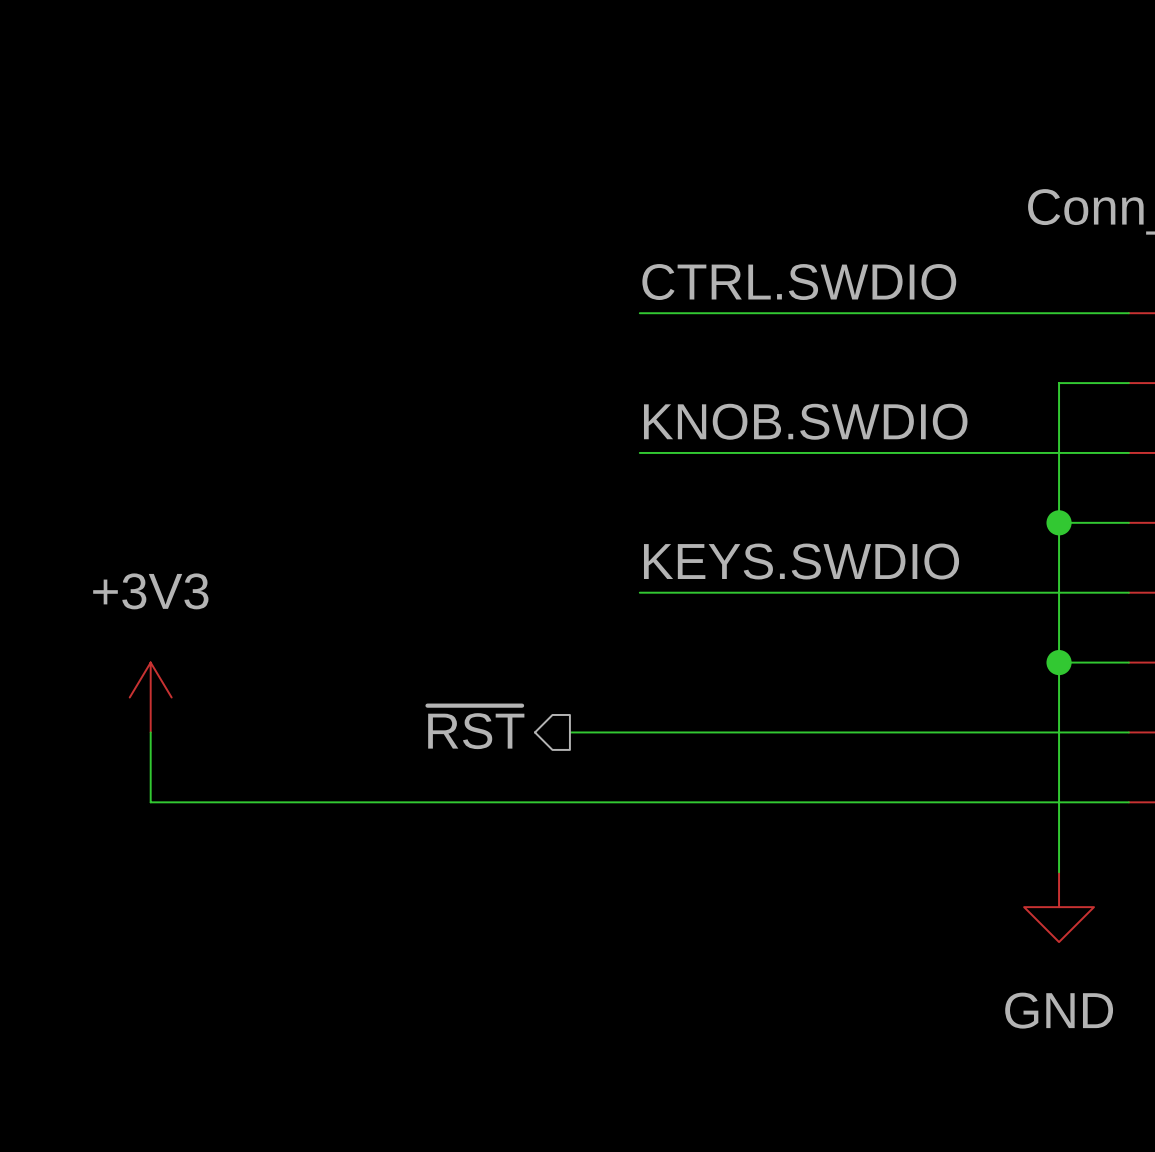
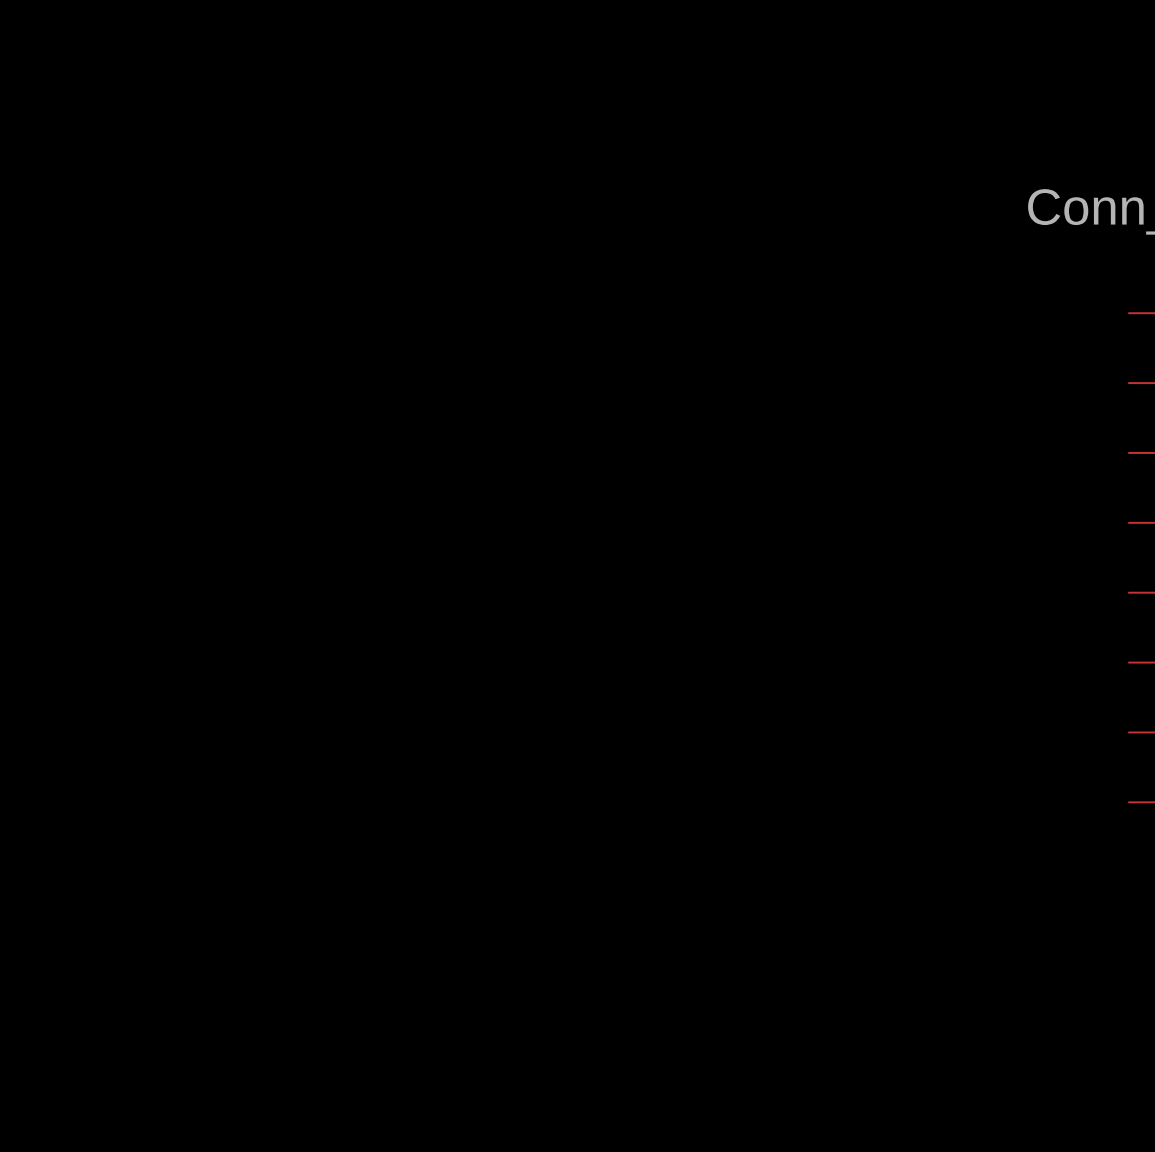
label: CTRL.SWDIO (799, 282) -> none
wire: (639, 313) (1128, 313) -> none
wire: (1128, 383) (1059, 383) (1059, 872) -> none
label: KNOB.SWDIO (805, 421) -> none
wire: (639, 452) (1128, 452) -> none
wire: (1059, 522) (1128, 522) -> none
junction: (1059, 522) -> none
label: KEYS.SWDIO (801, 561) -> none
wire: (639, 592) (1128, 592) -> none
wire: (1059, 662) (1128, 662) -> none
junction: (1059, 662) -> none
power symbol: +3V3 (150, 697) -> none
hierarchical label: ~{RST} (475, 727) -> none
wire: (150, 732) (150, 802) (1128, 802) -> none
wire: (569, 732) (1128, 732) -> none
power symbol: GND (1059, 907) -> none

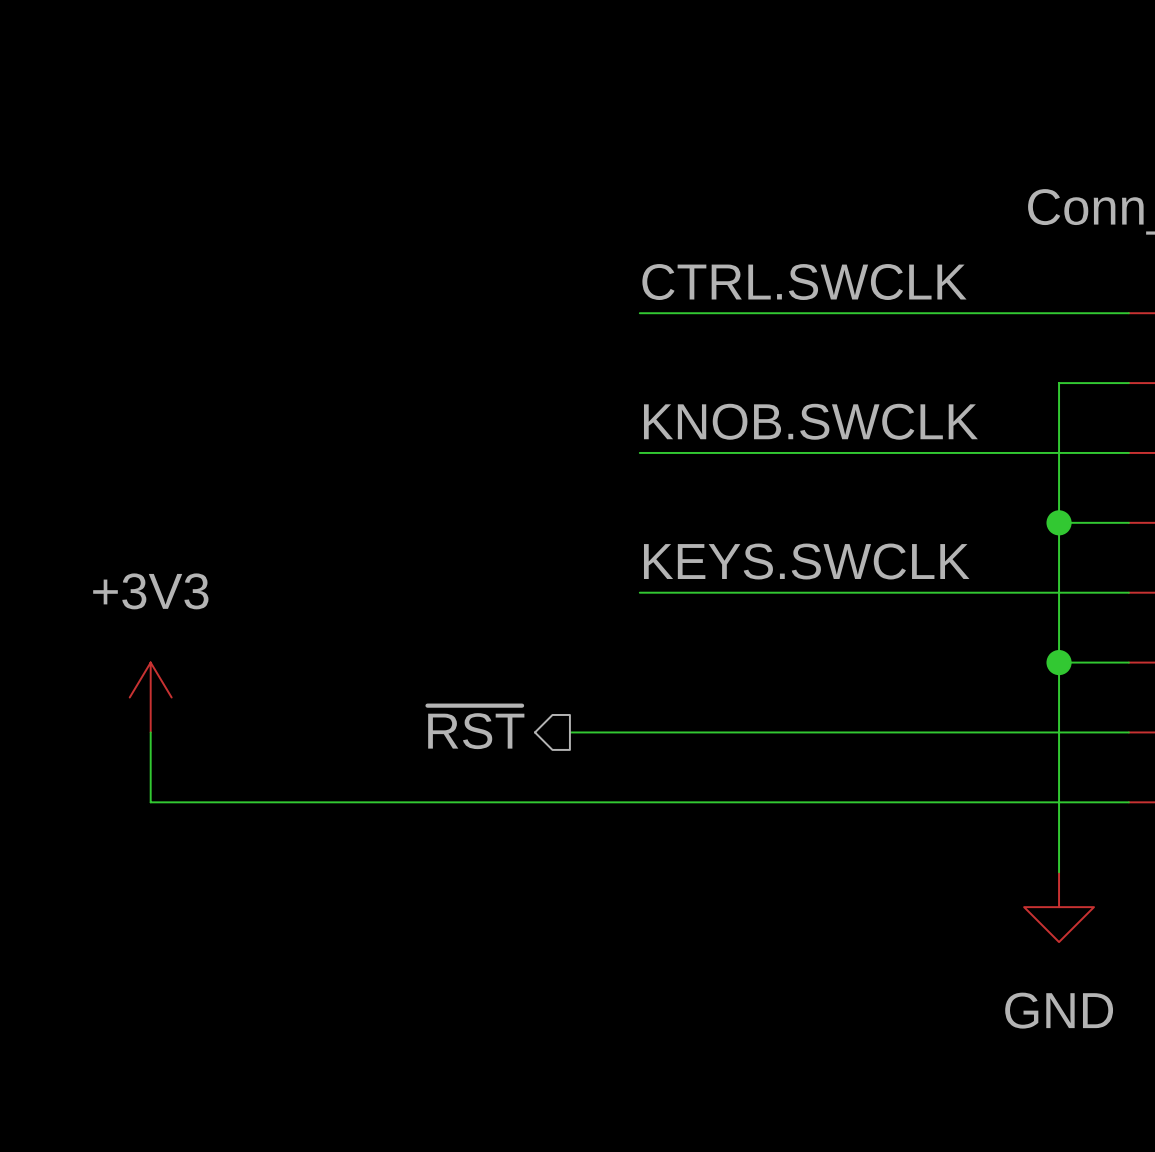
label: none -> CTRL.SWCLK (804, 282)
wire: none -> (639, 313) (1128, 313)
wire: none -> (1128, 383) (1059, 383) (1059, 872)
label: none -> KNOB.SWCLK (810, 421)
wire: none -> (639, 452) (1128, 452)
wire: none -> (1059, 522) (1128, 522)
junction: none -> (1059, 522)
label: none -> KEYS.SWCLK (806, 561)
wire: none -> (639, 592) (1128, 592)
wire: none -> (1059, 662) (1128, 662)
junction: none -> (1059, 662)
power symbol: none -> +3V3 (150, 697)
hierarchical label: none -> ~{RST} (475, 727)
wire: none -> (150, 732) (150, 802) (1128, 802)
wire: none -> (569, 732) (1128, 732)
power symbol: none -> GND (1059, 907)

